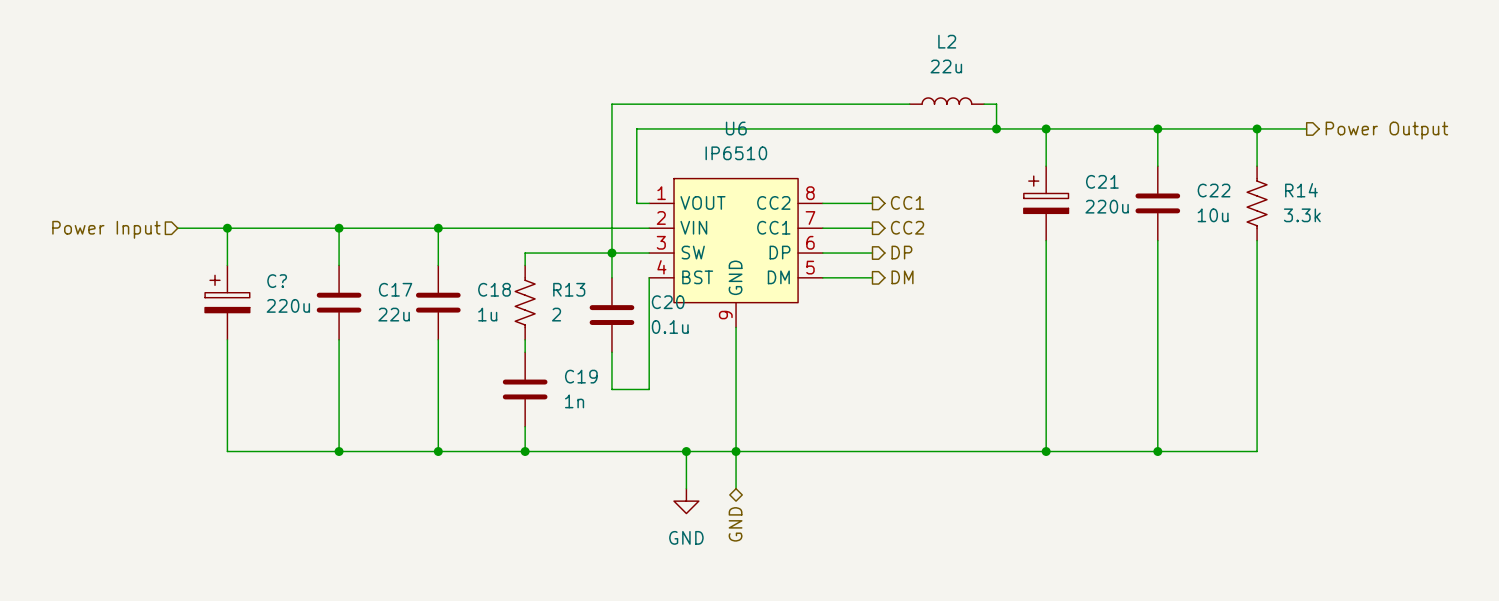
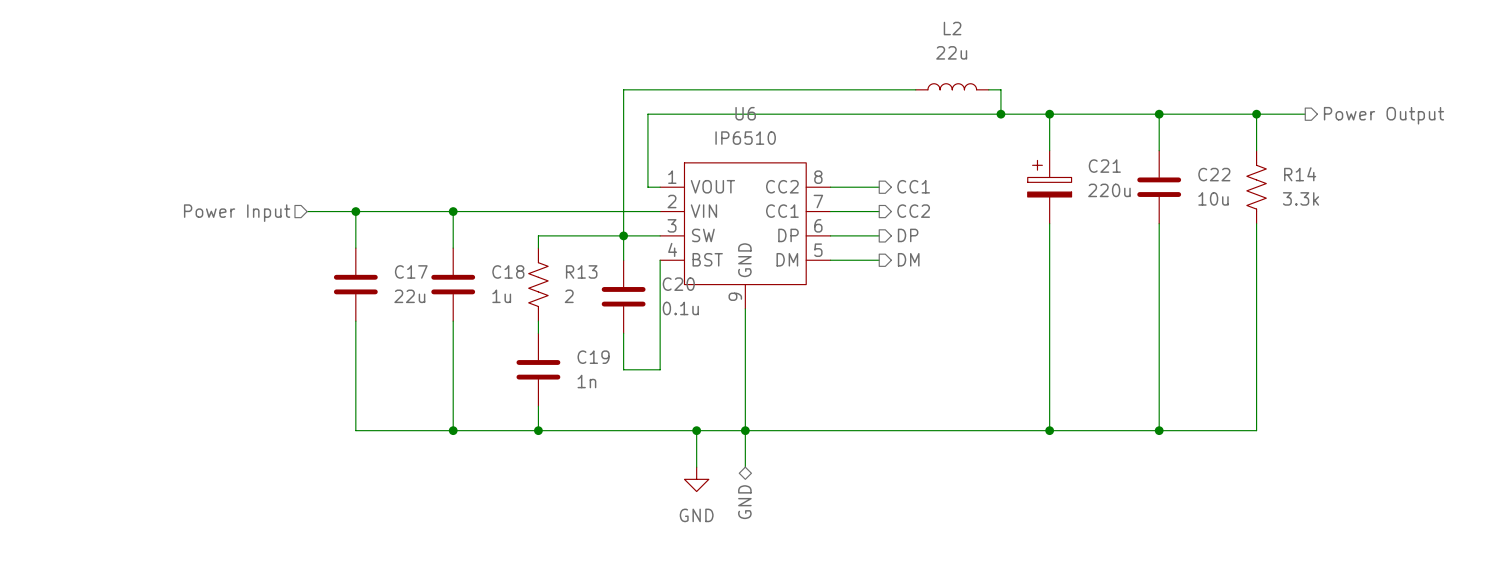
wire: (177, 228) (289, 228) -> none
wire: (227, 228) (227, 265) -> none
junction: (227, 228) -> none
hierarchical label position: Power Input (106, 229) -> Power Input (237, 213)
C?: 220u (227, 302) -> none
wire: (227, 339) (227, 451) (339, 451) -> none
junction: (339, 451) -> none

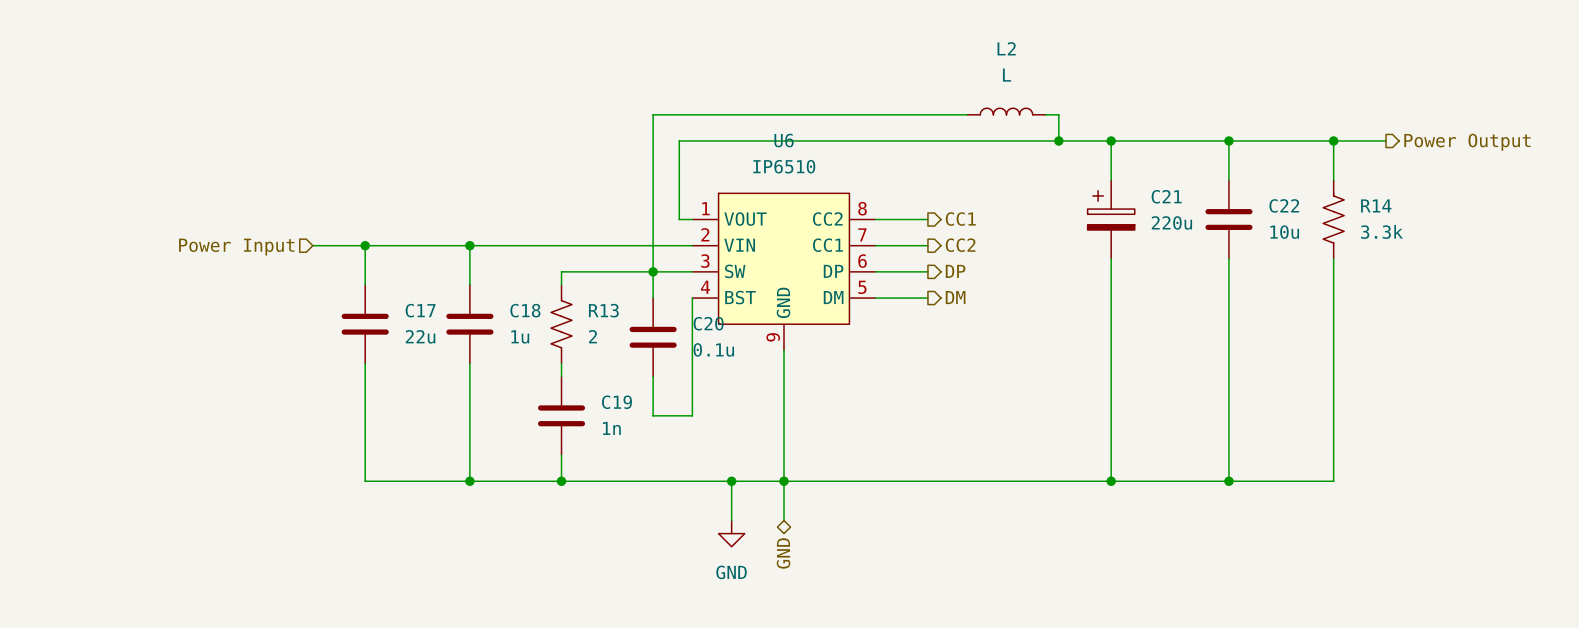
L2 value: 22u (951, 52) -> L (1007, 75)

